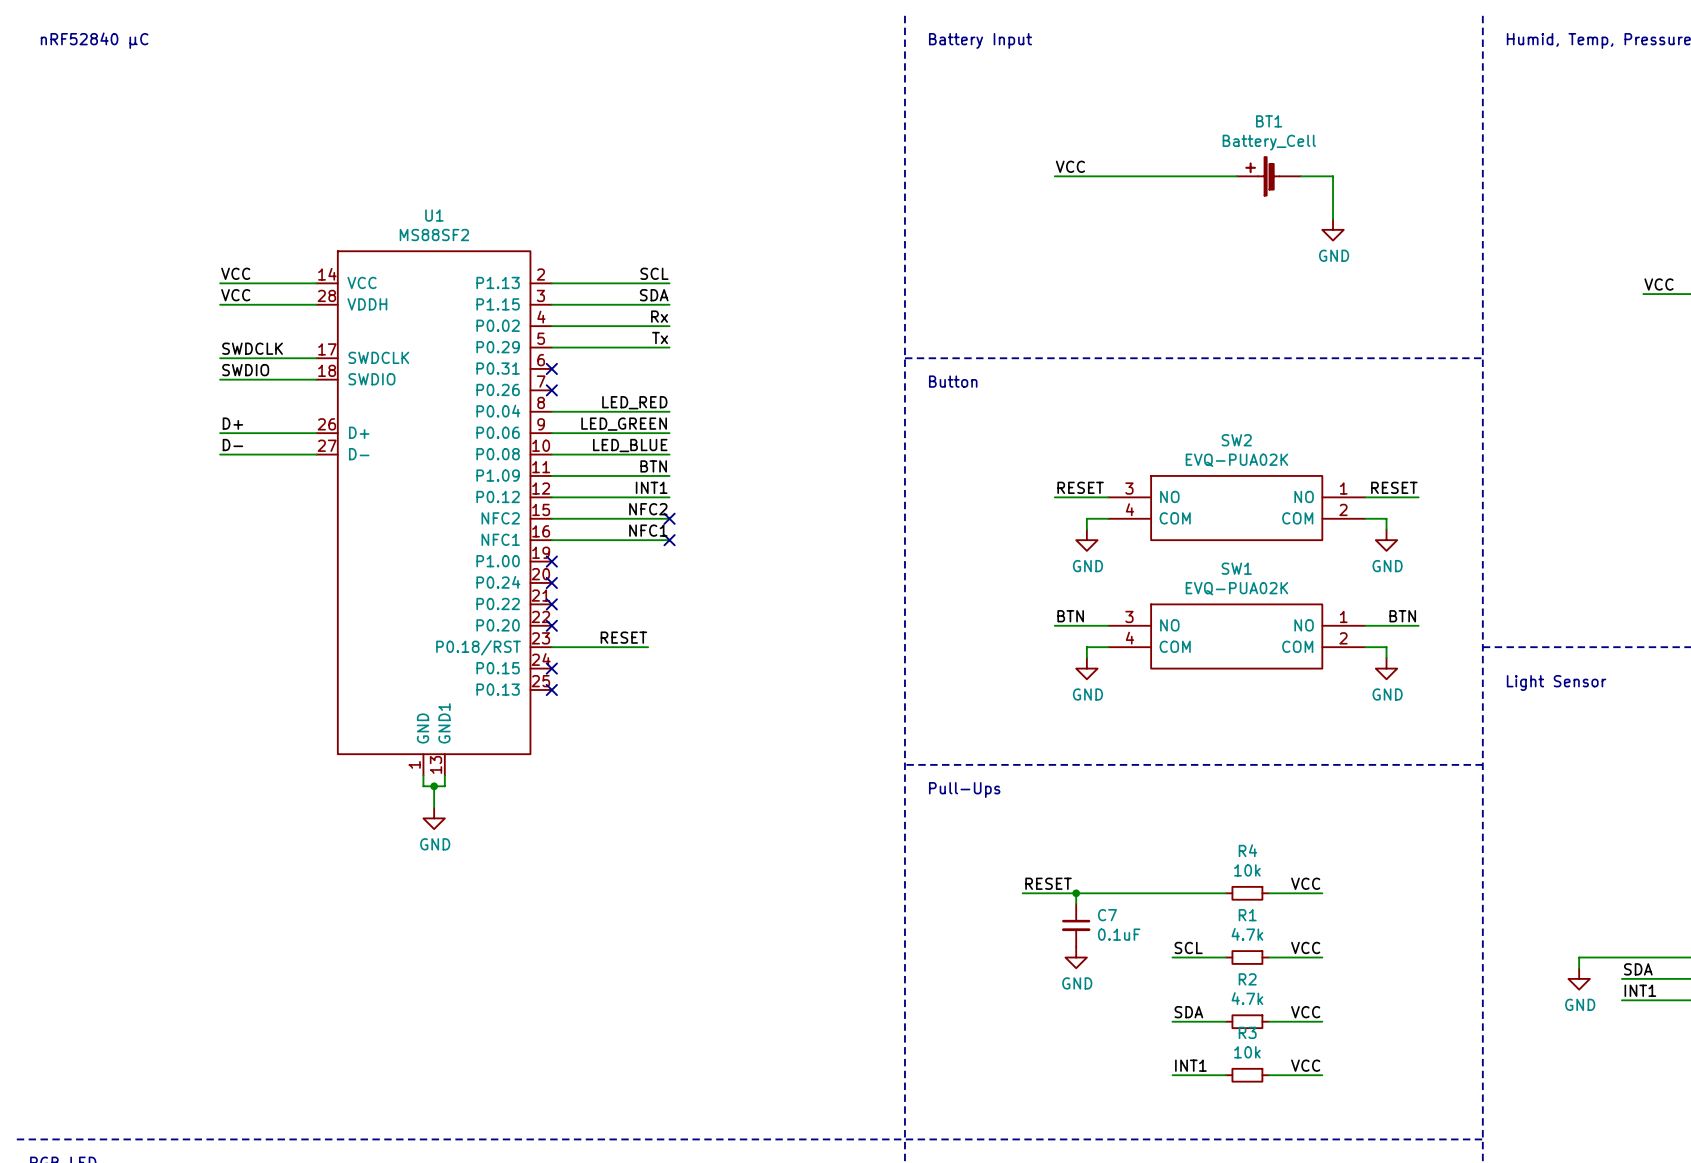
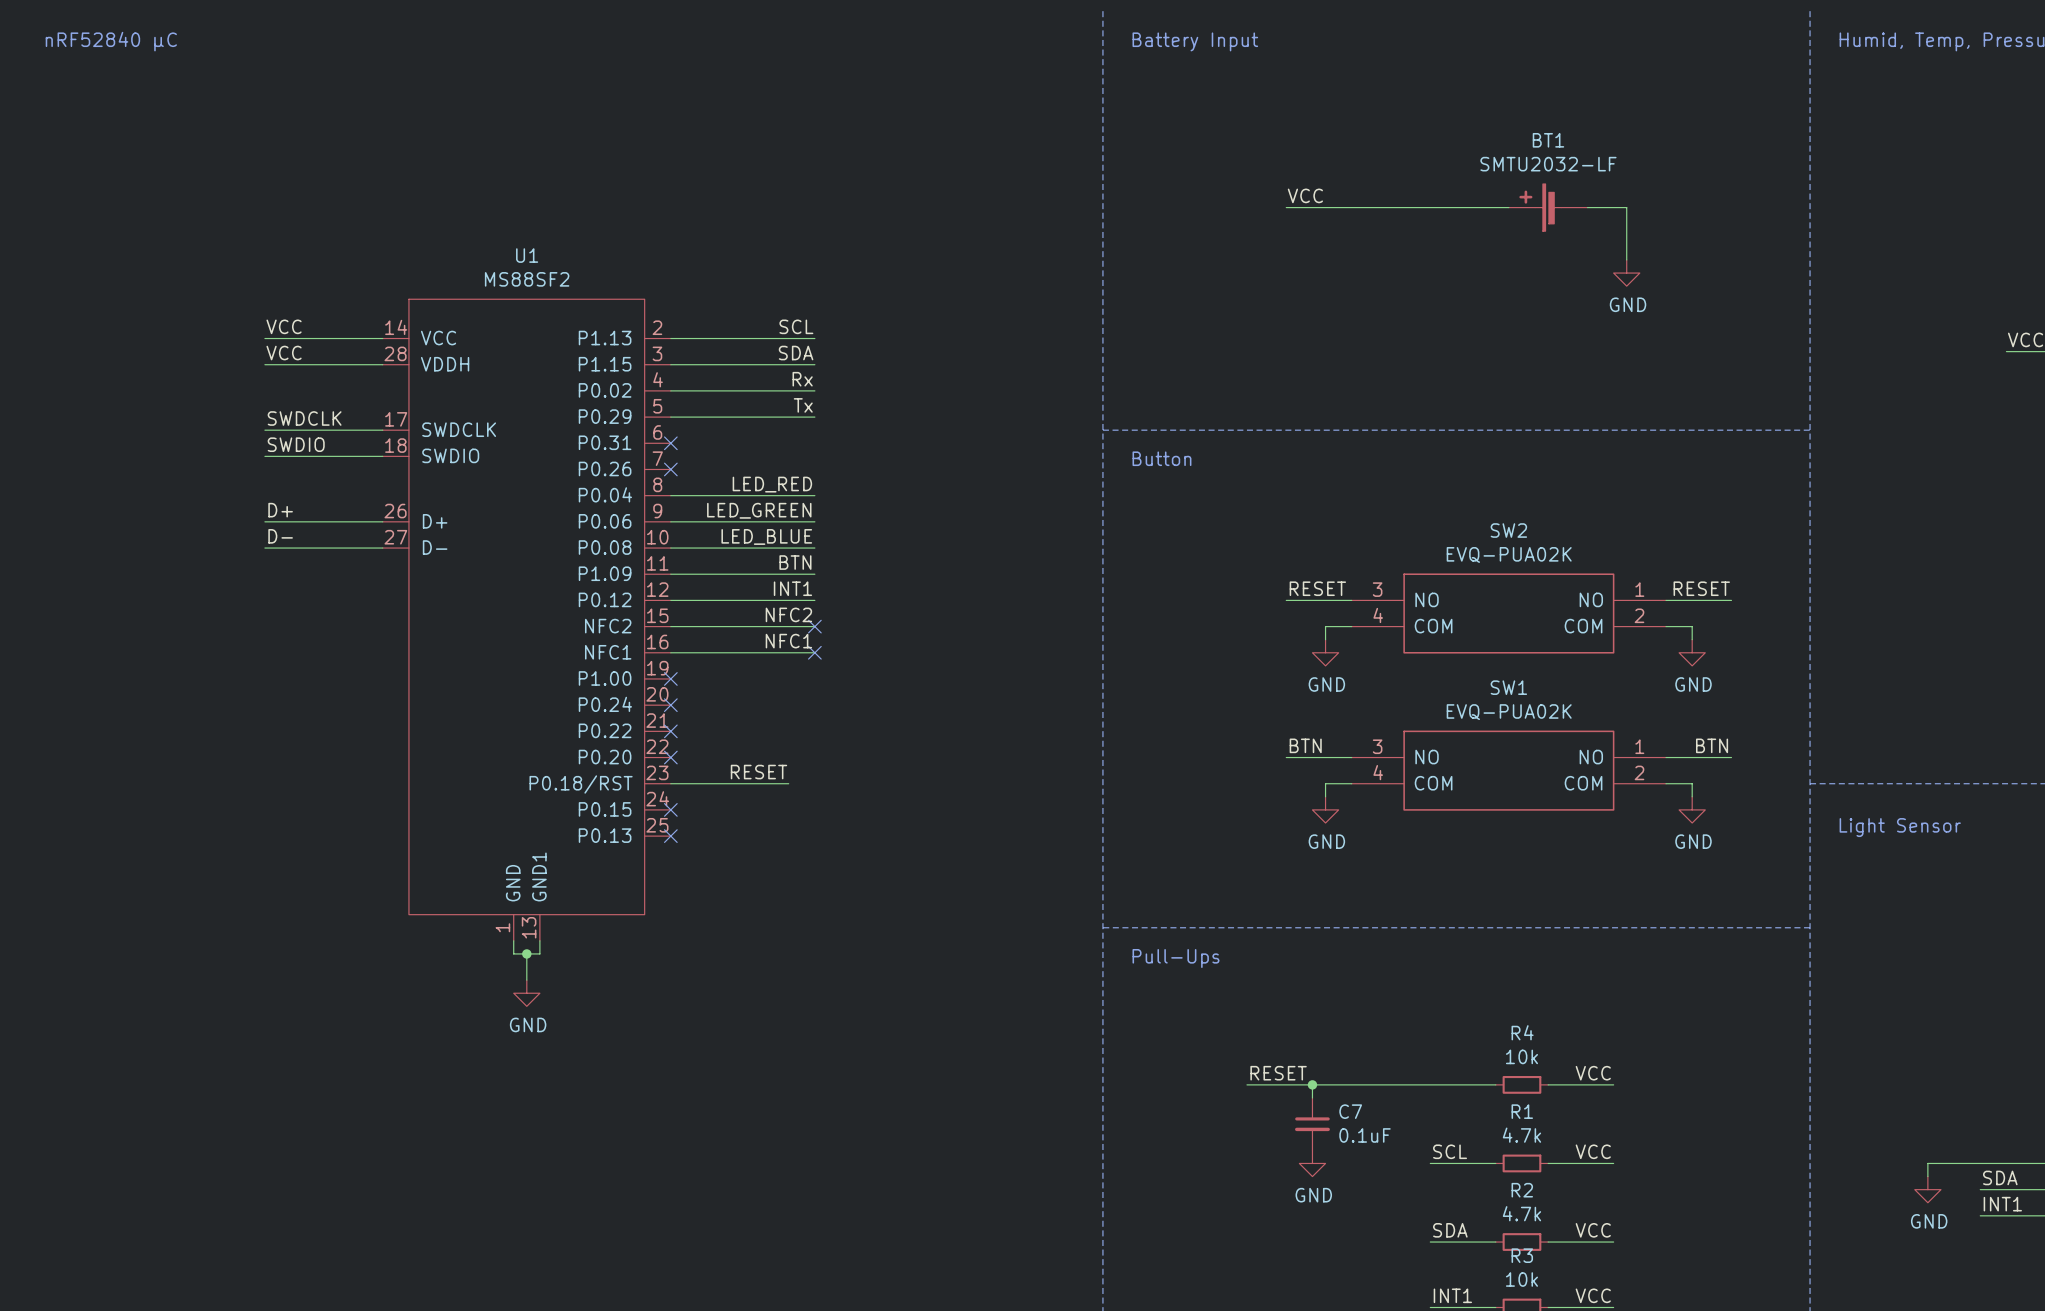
BT1 value: Battery_Cell (1269, 142) -> SMTU2032-LF (1548, 164)

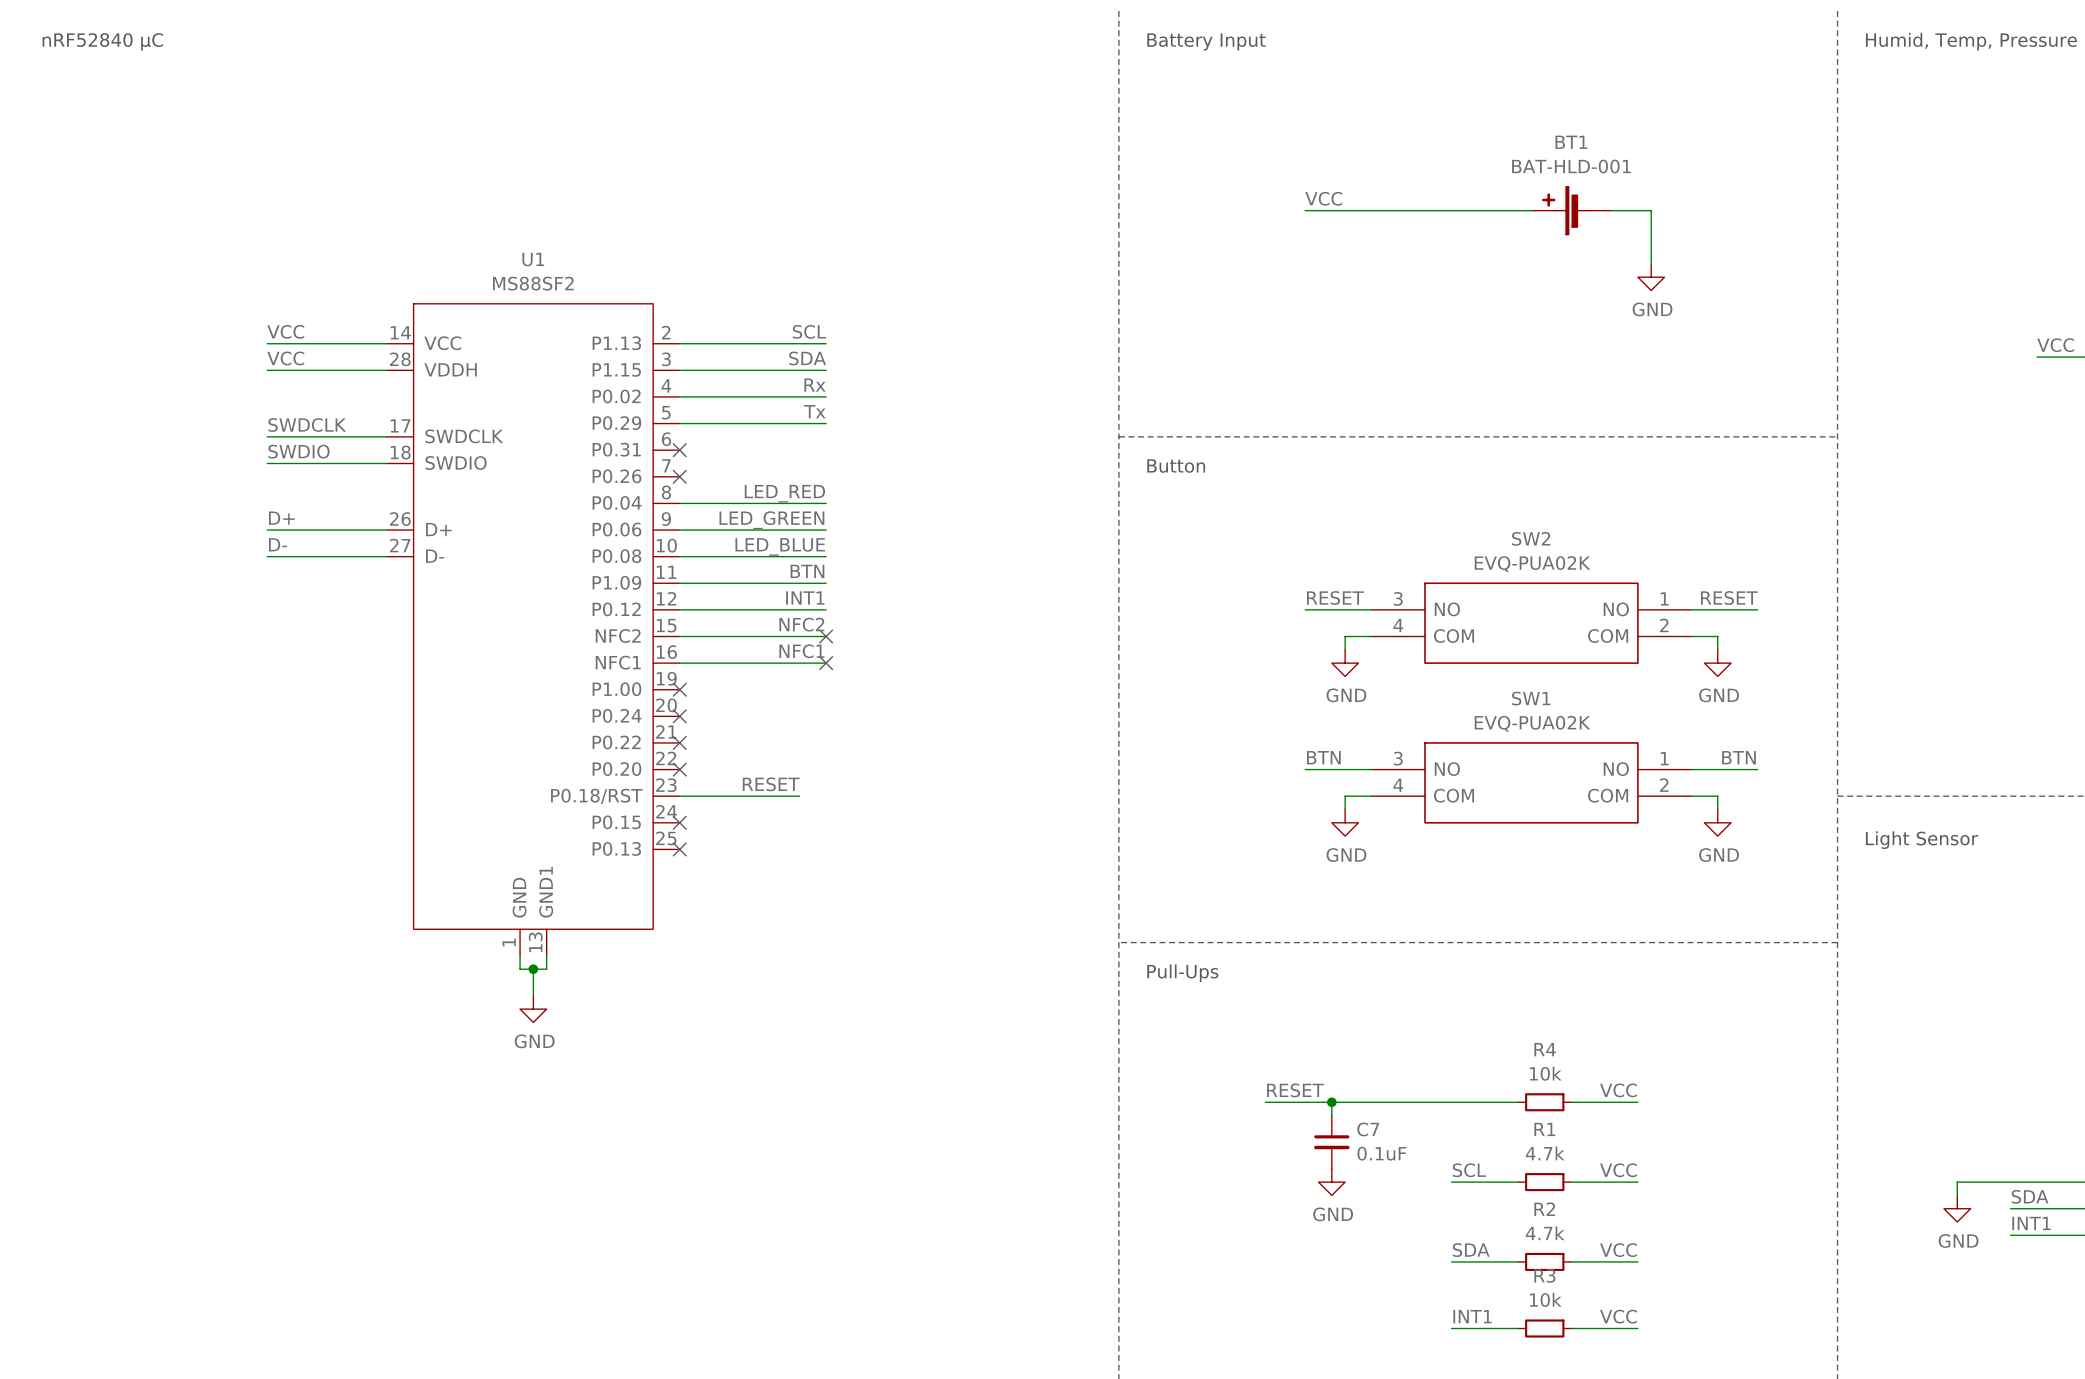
BT1 value: SMTU2032-LF (1548, 164) -> BAT-HLD-001 (1571, 166)

